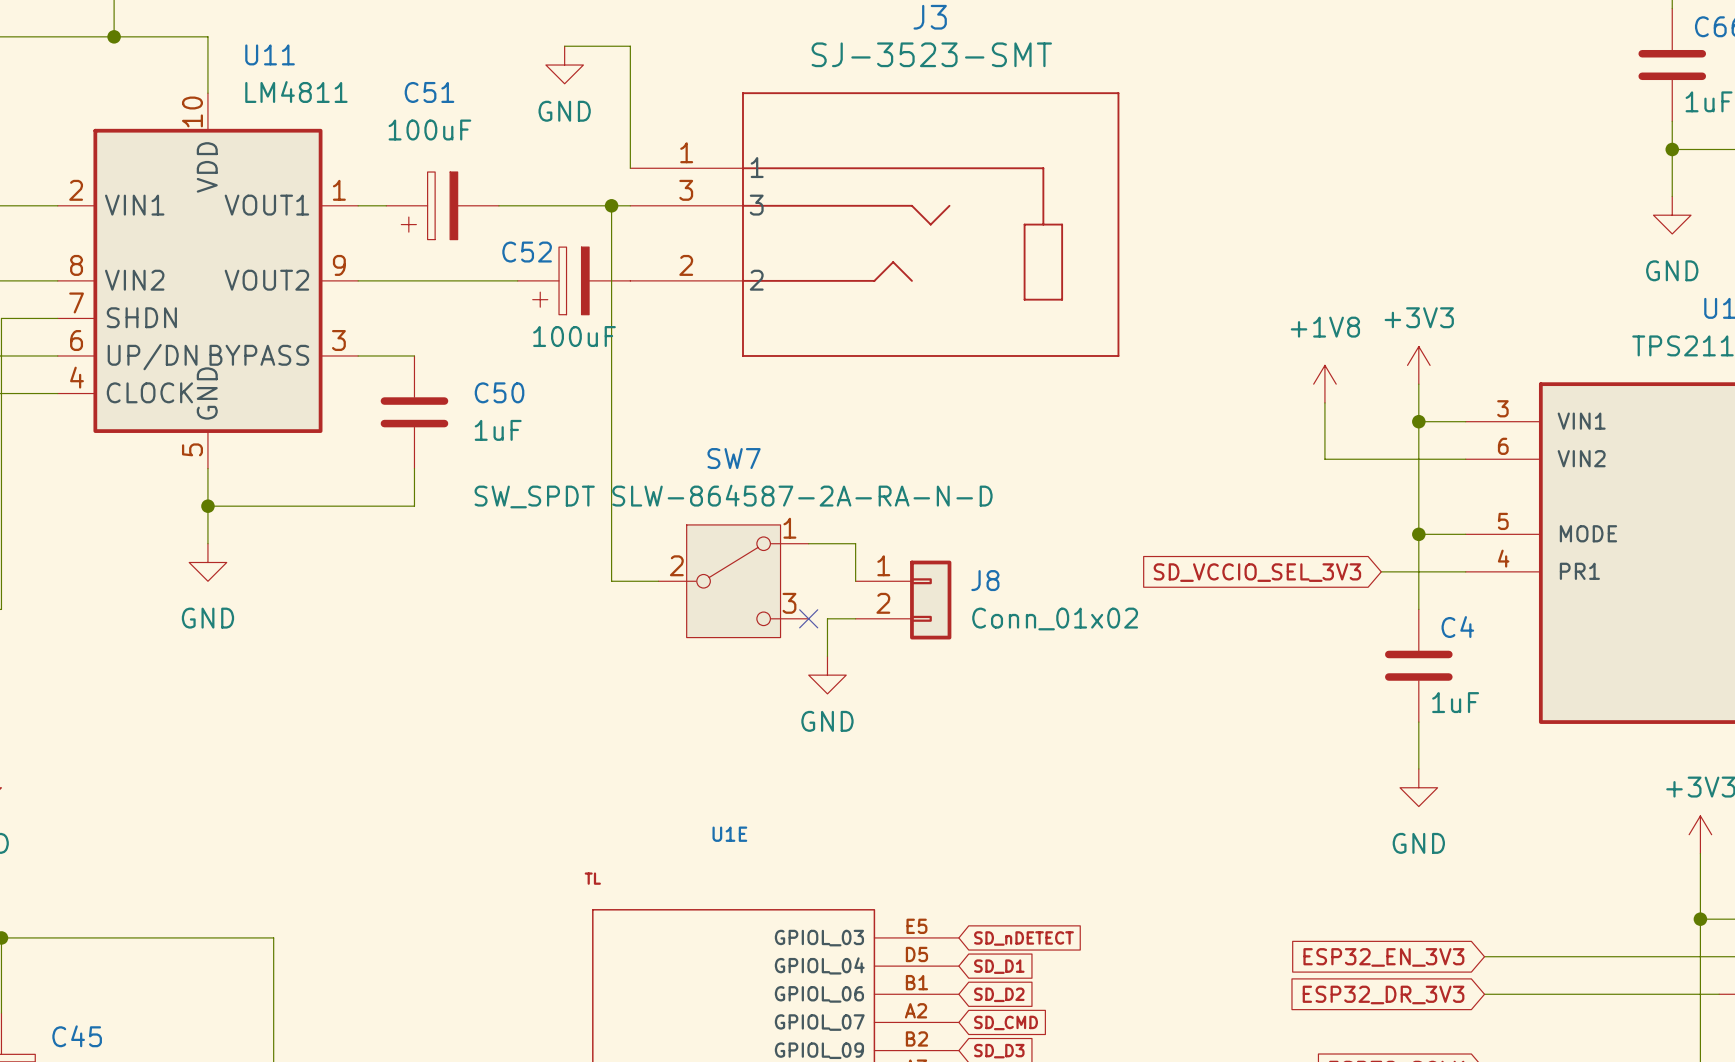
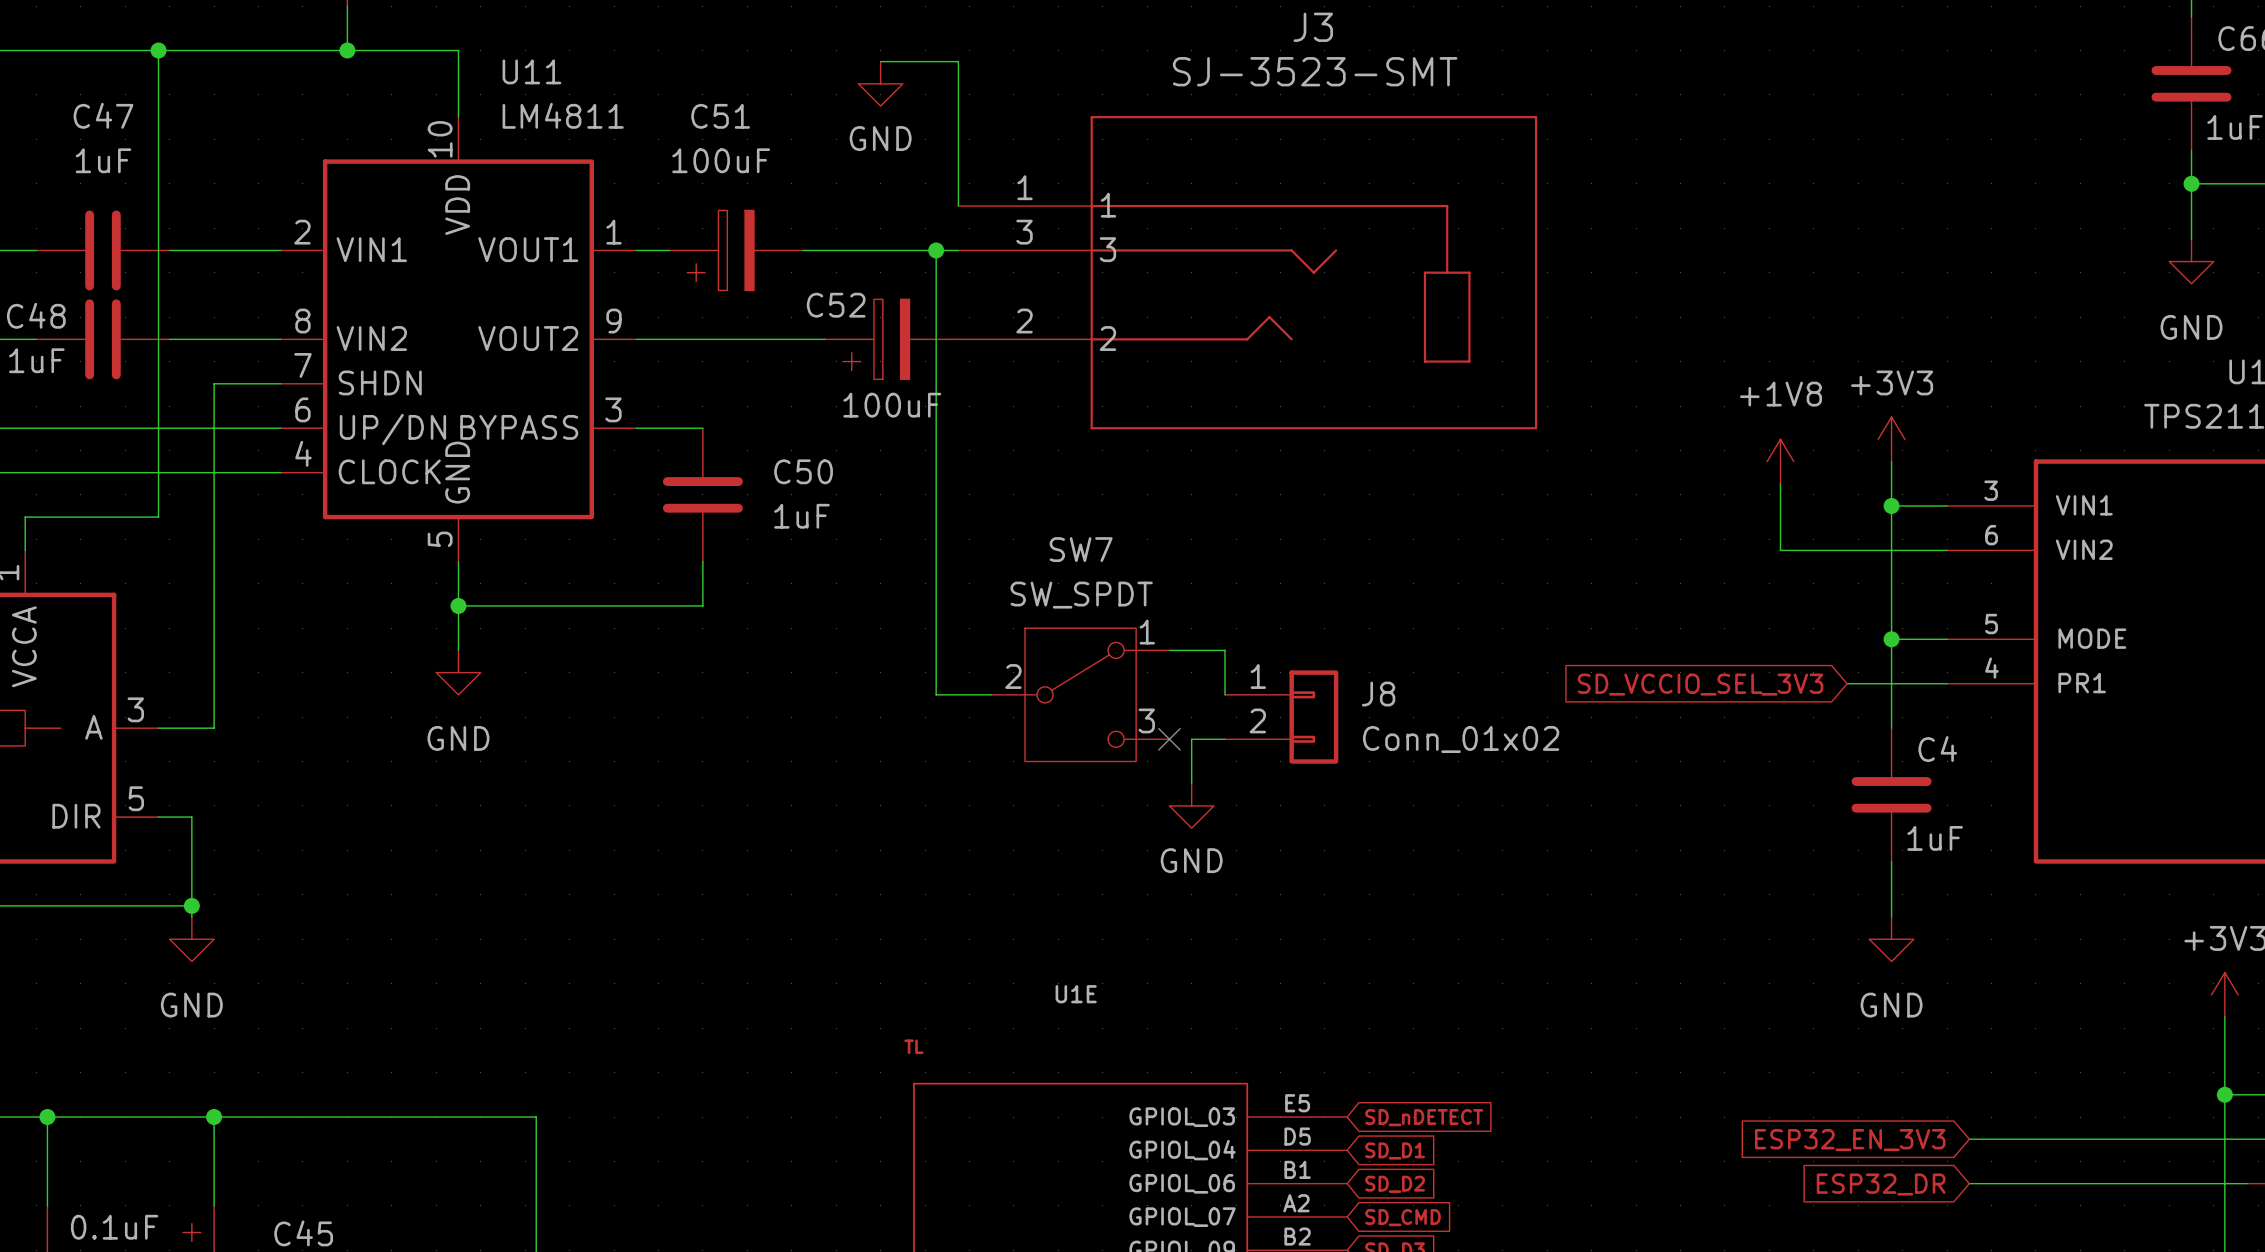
SW7 value: SW_SPDT SLW-864587-2A-RA-N-D (733, 496) -> SW_SPDT (1081, 595)
global label: ESP32_DR_3V3 (1383, 994) -> ESP32_DR (1881, 1184)

